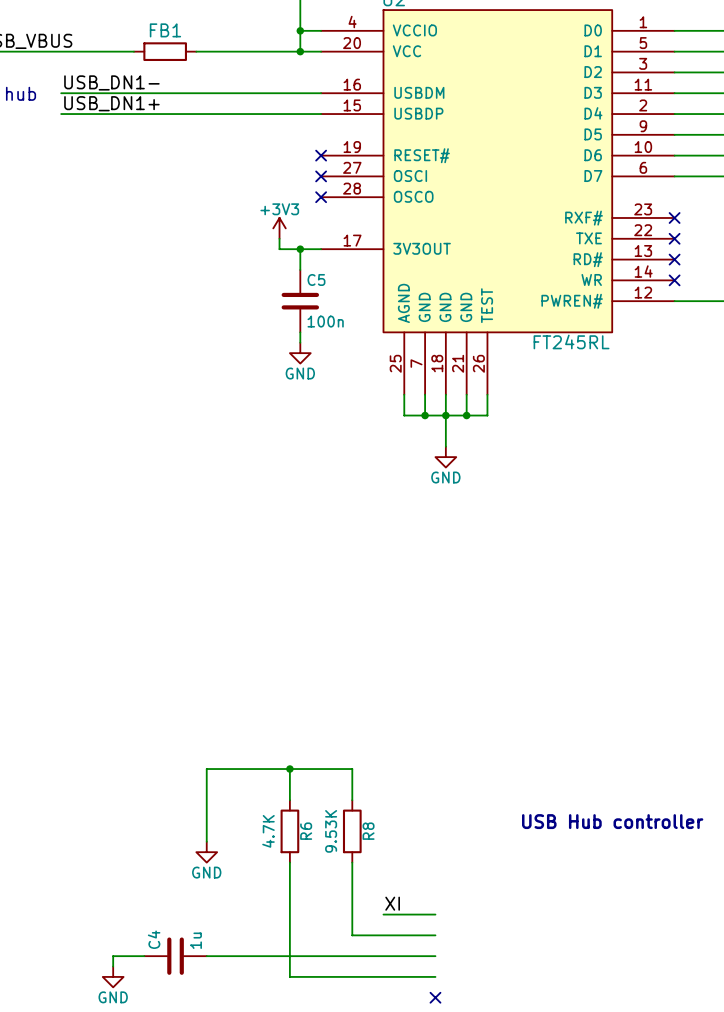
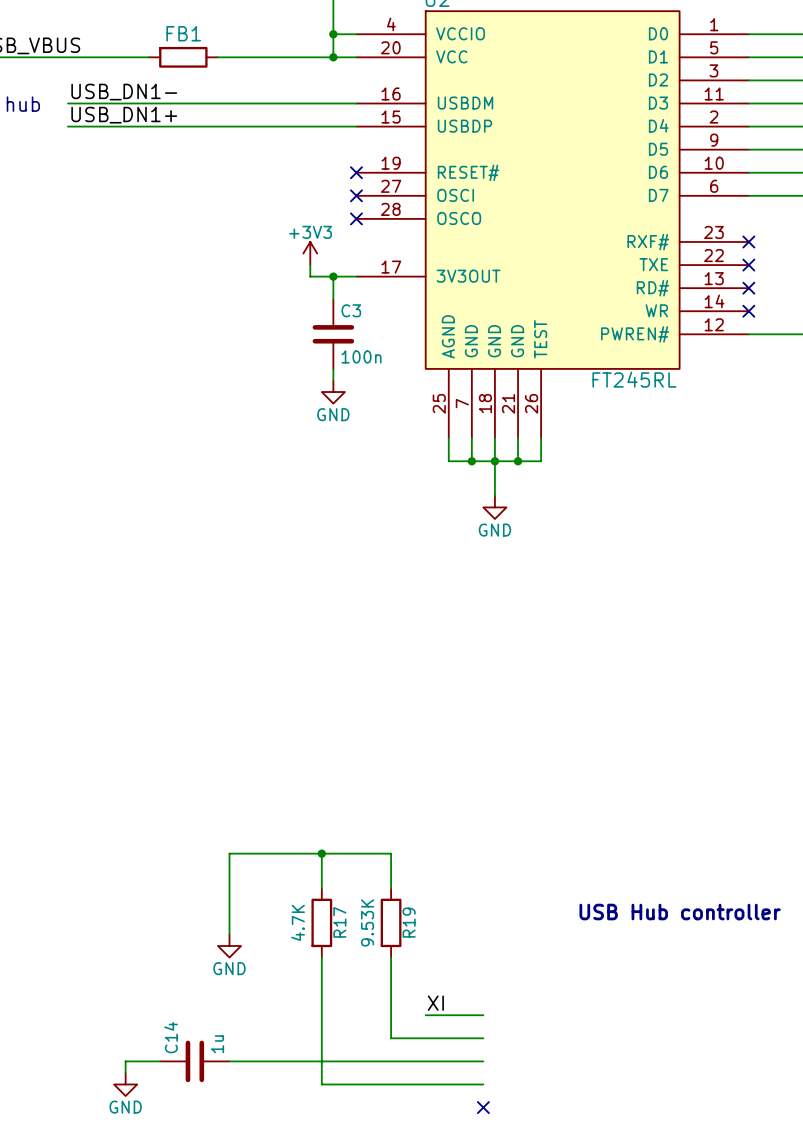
C5 name: C5 (316, 279) -> C3 (351, 310)
R6 name: R6 (306, 831) -> R17 (339, 922)
R8 name: R8 (368, 831) -> R19 (409, 922)
C4 name: C4 (154, 939) -> C14 (171, 1037)

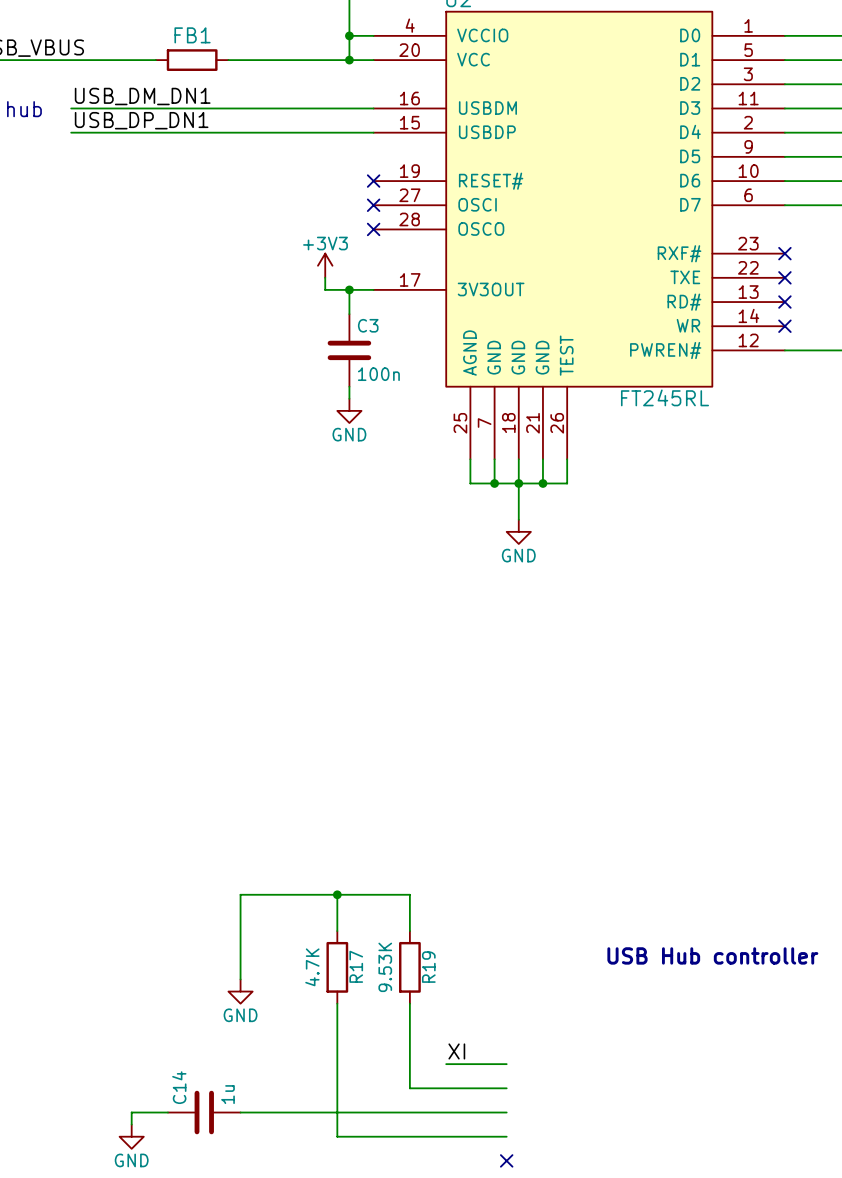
label: USB_DN1- (124, 92) -> USB_DM_DN1 (142, 96)
label: USB_DN1+ (124, 115) -> USB_DP_DN1 (141, 120)

